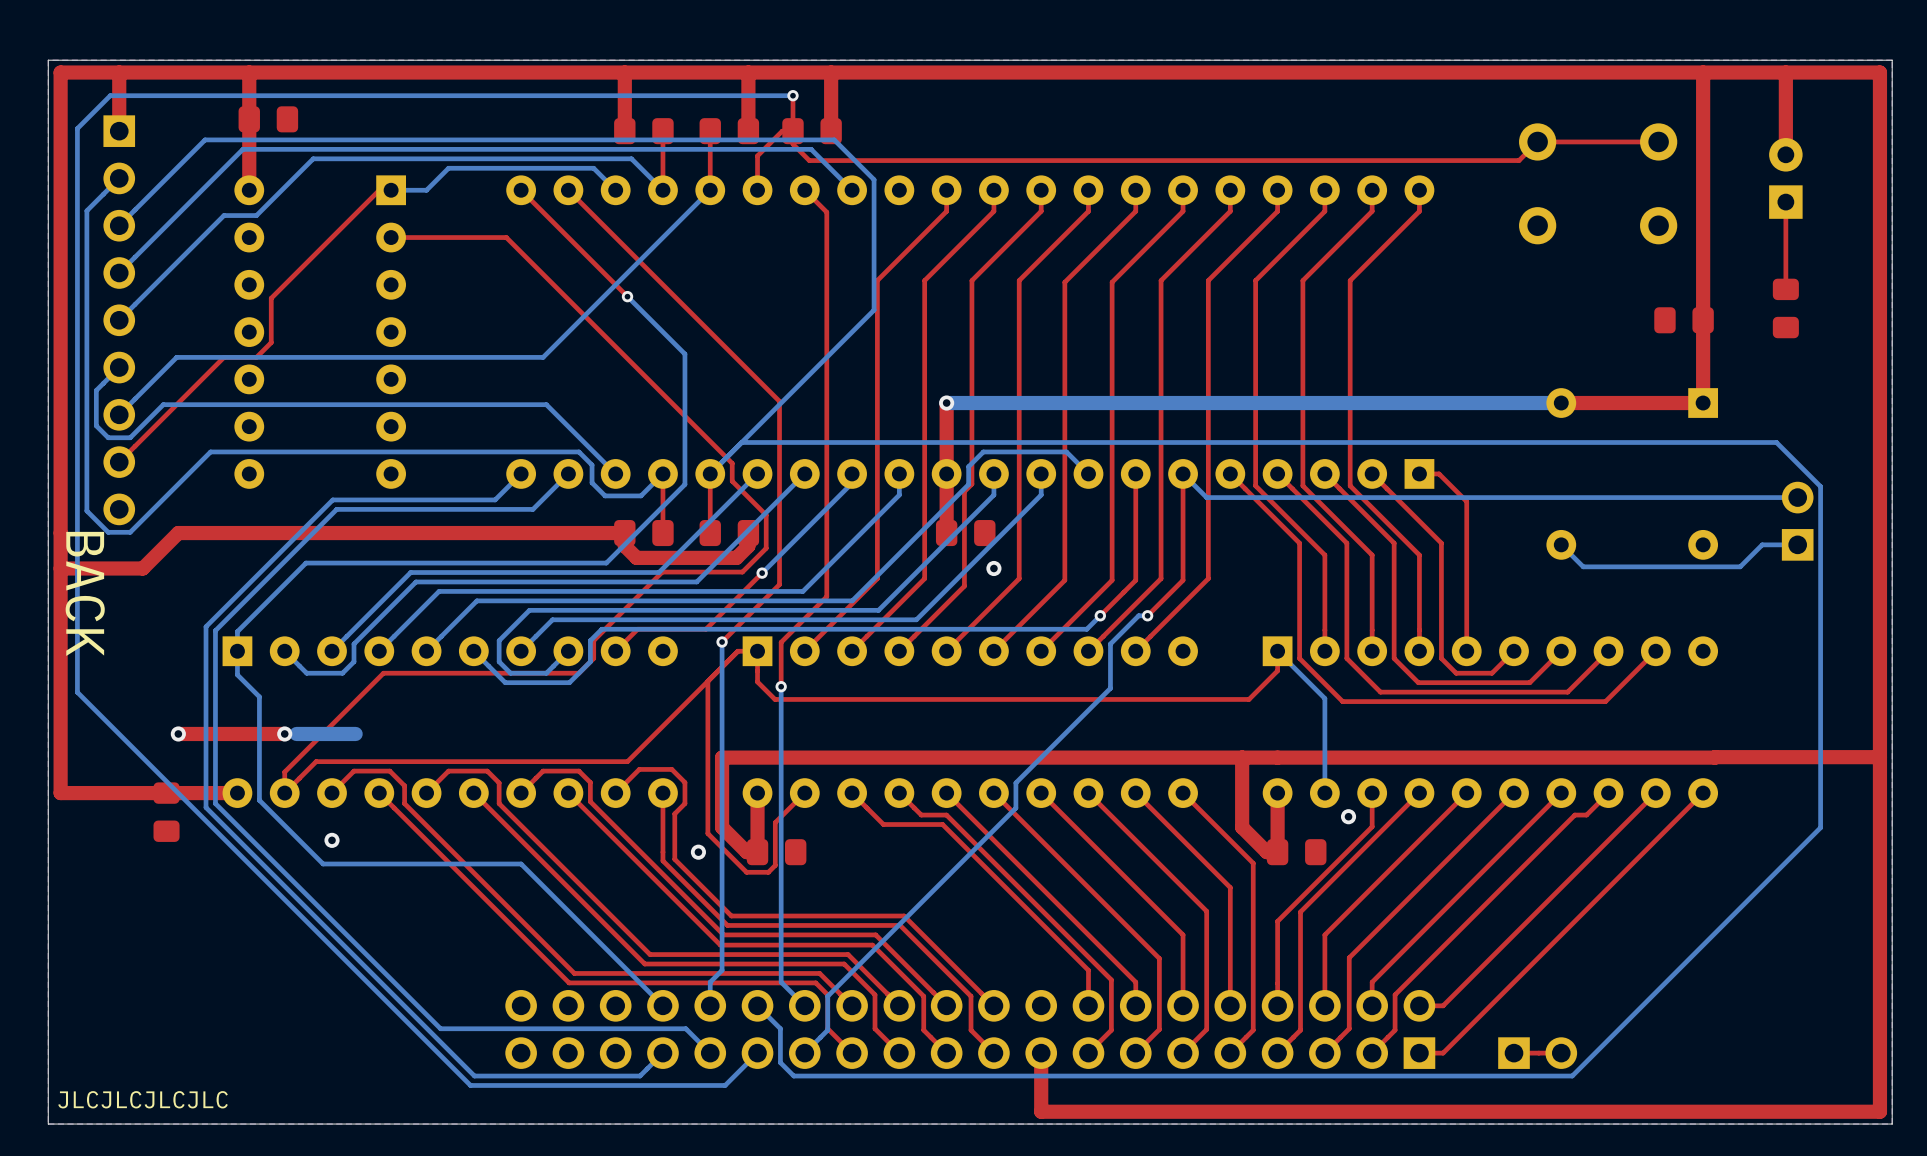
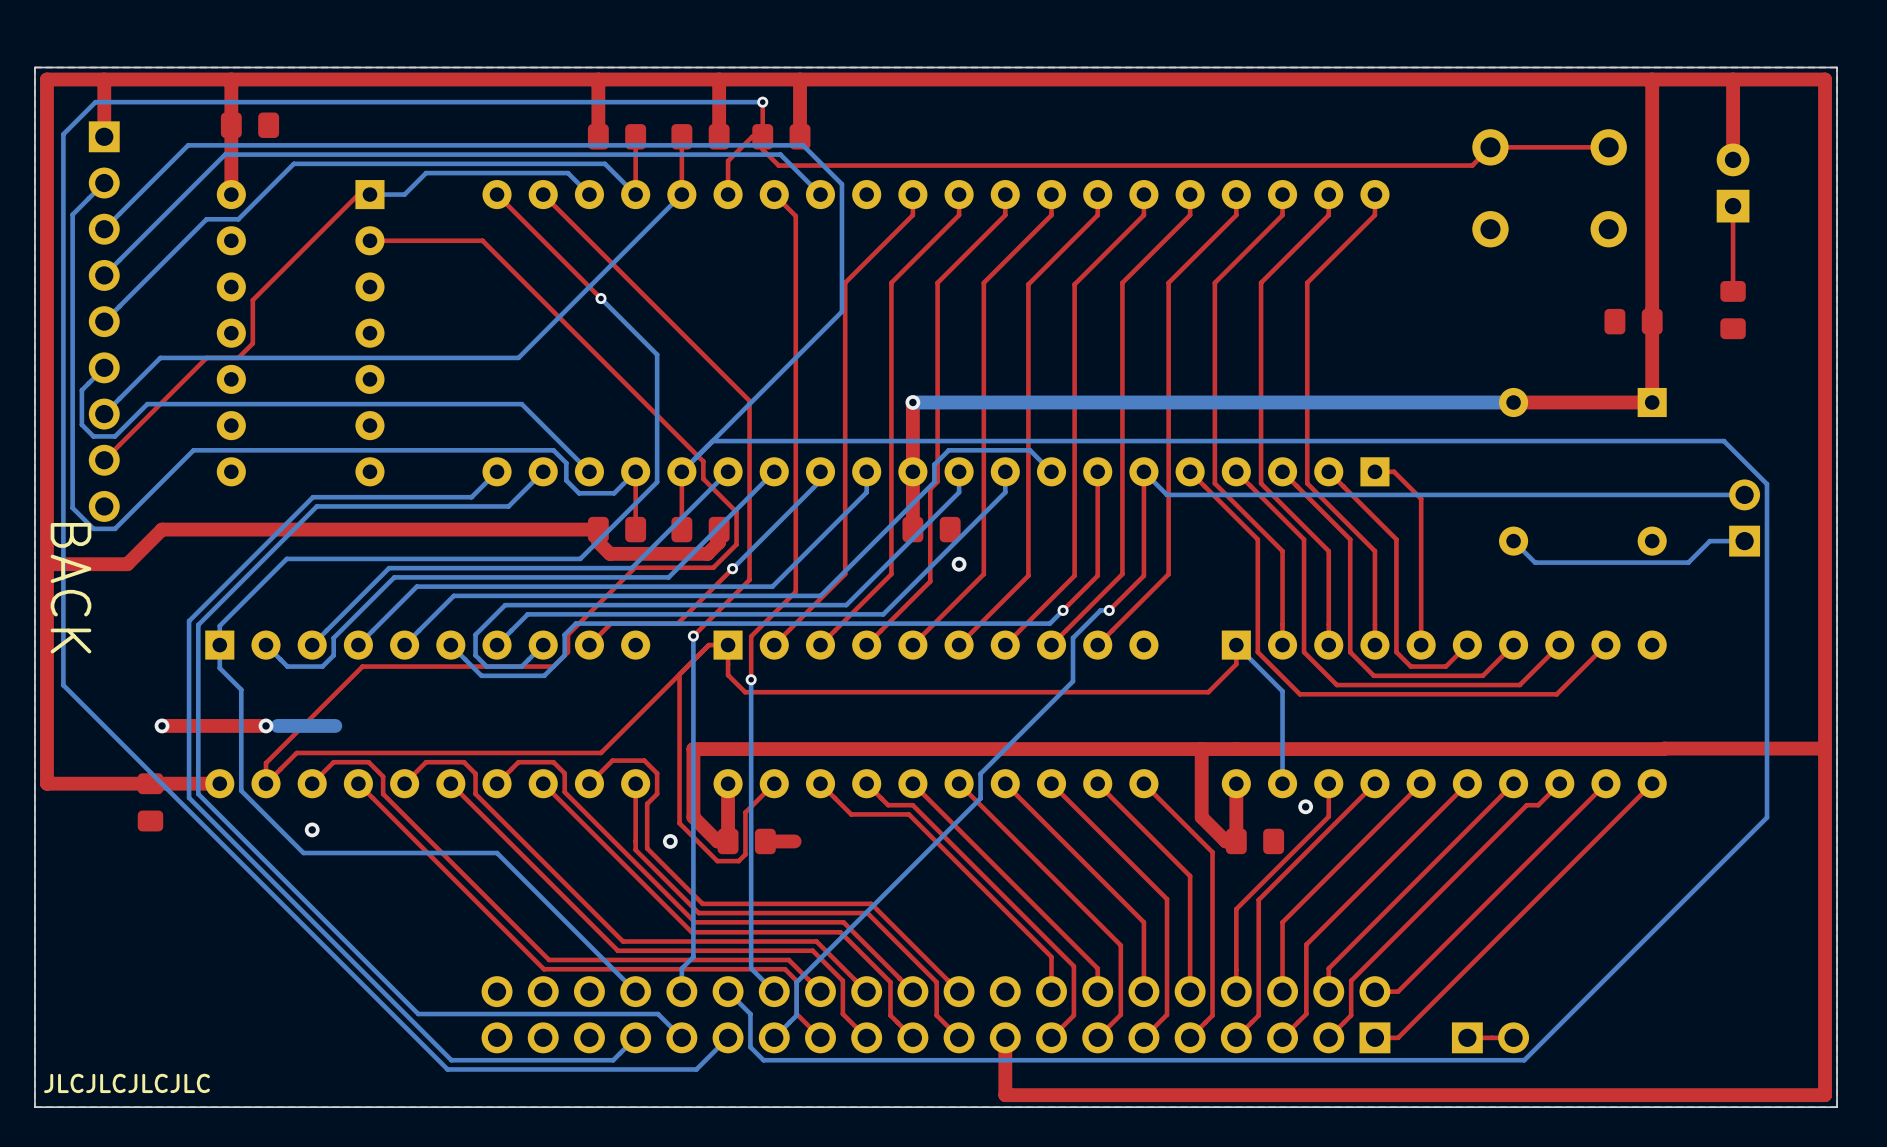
top track: none -> (794, 841) (765, 841)

